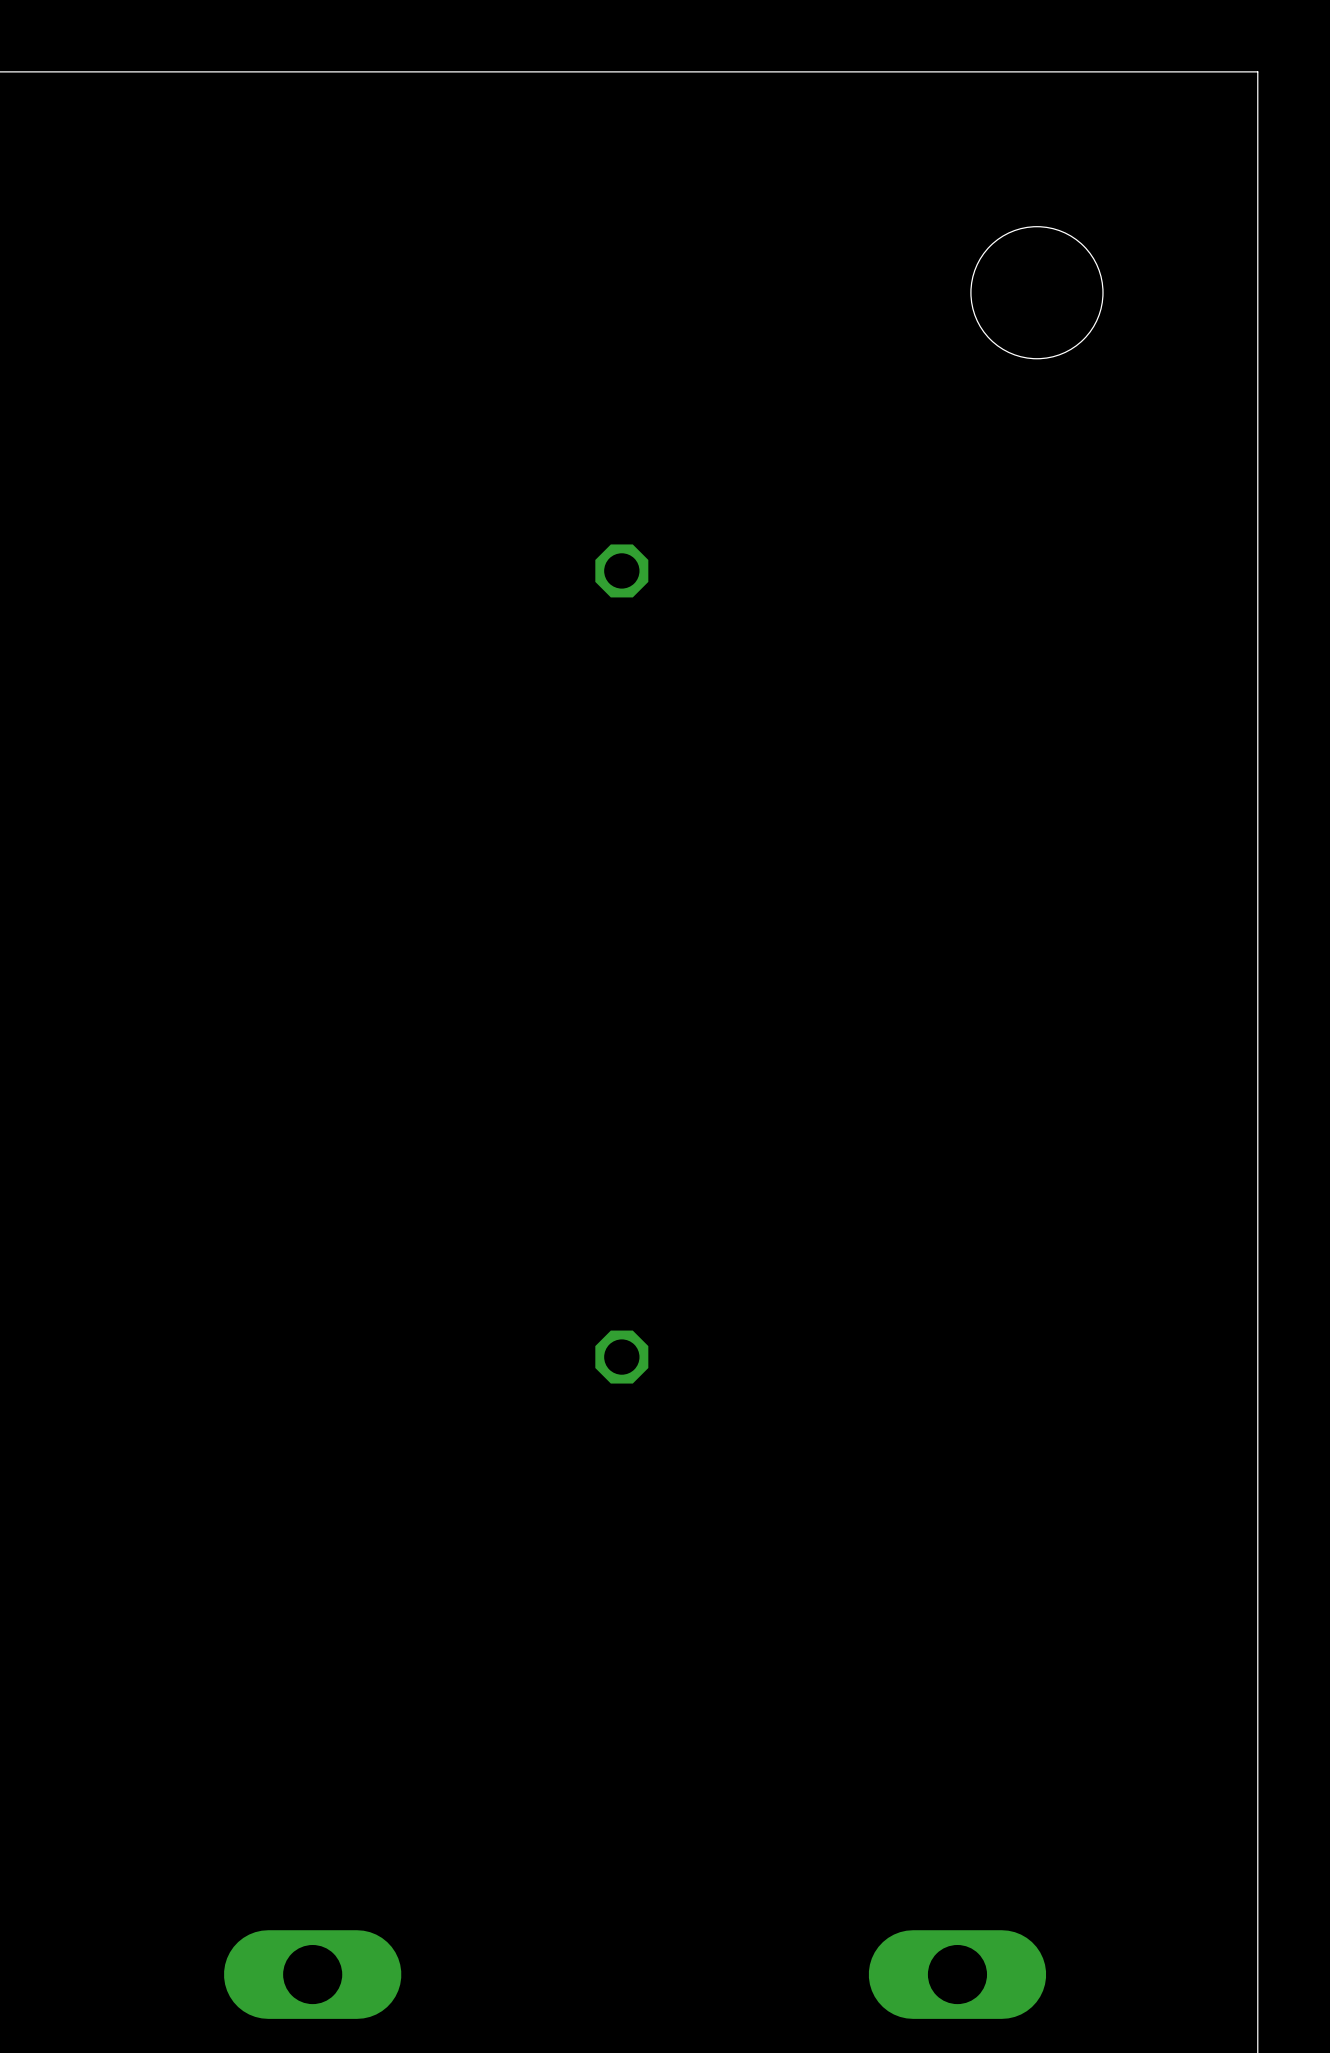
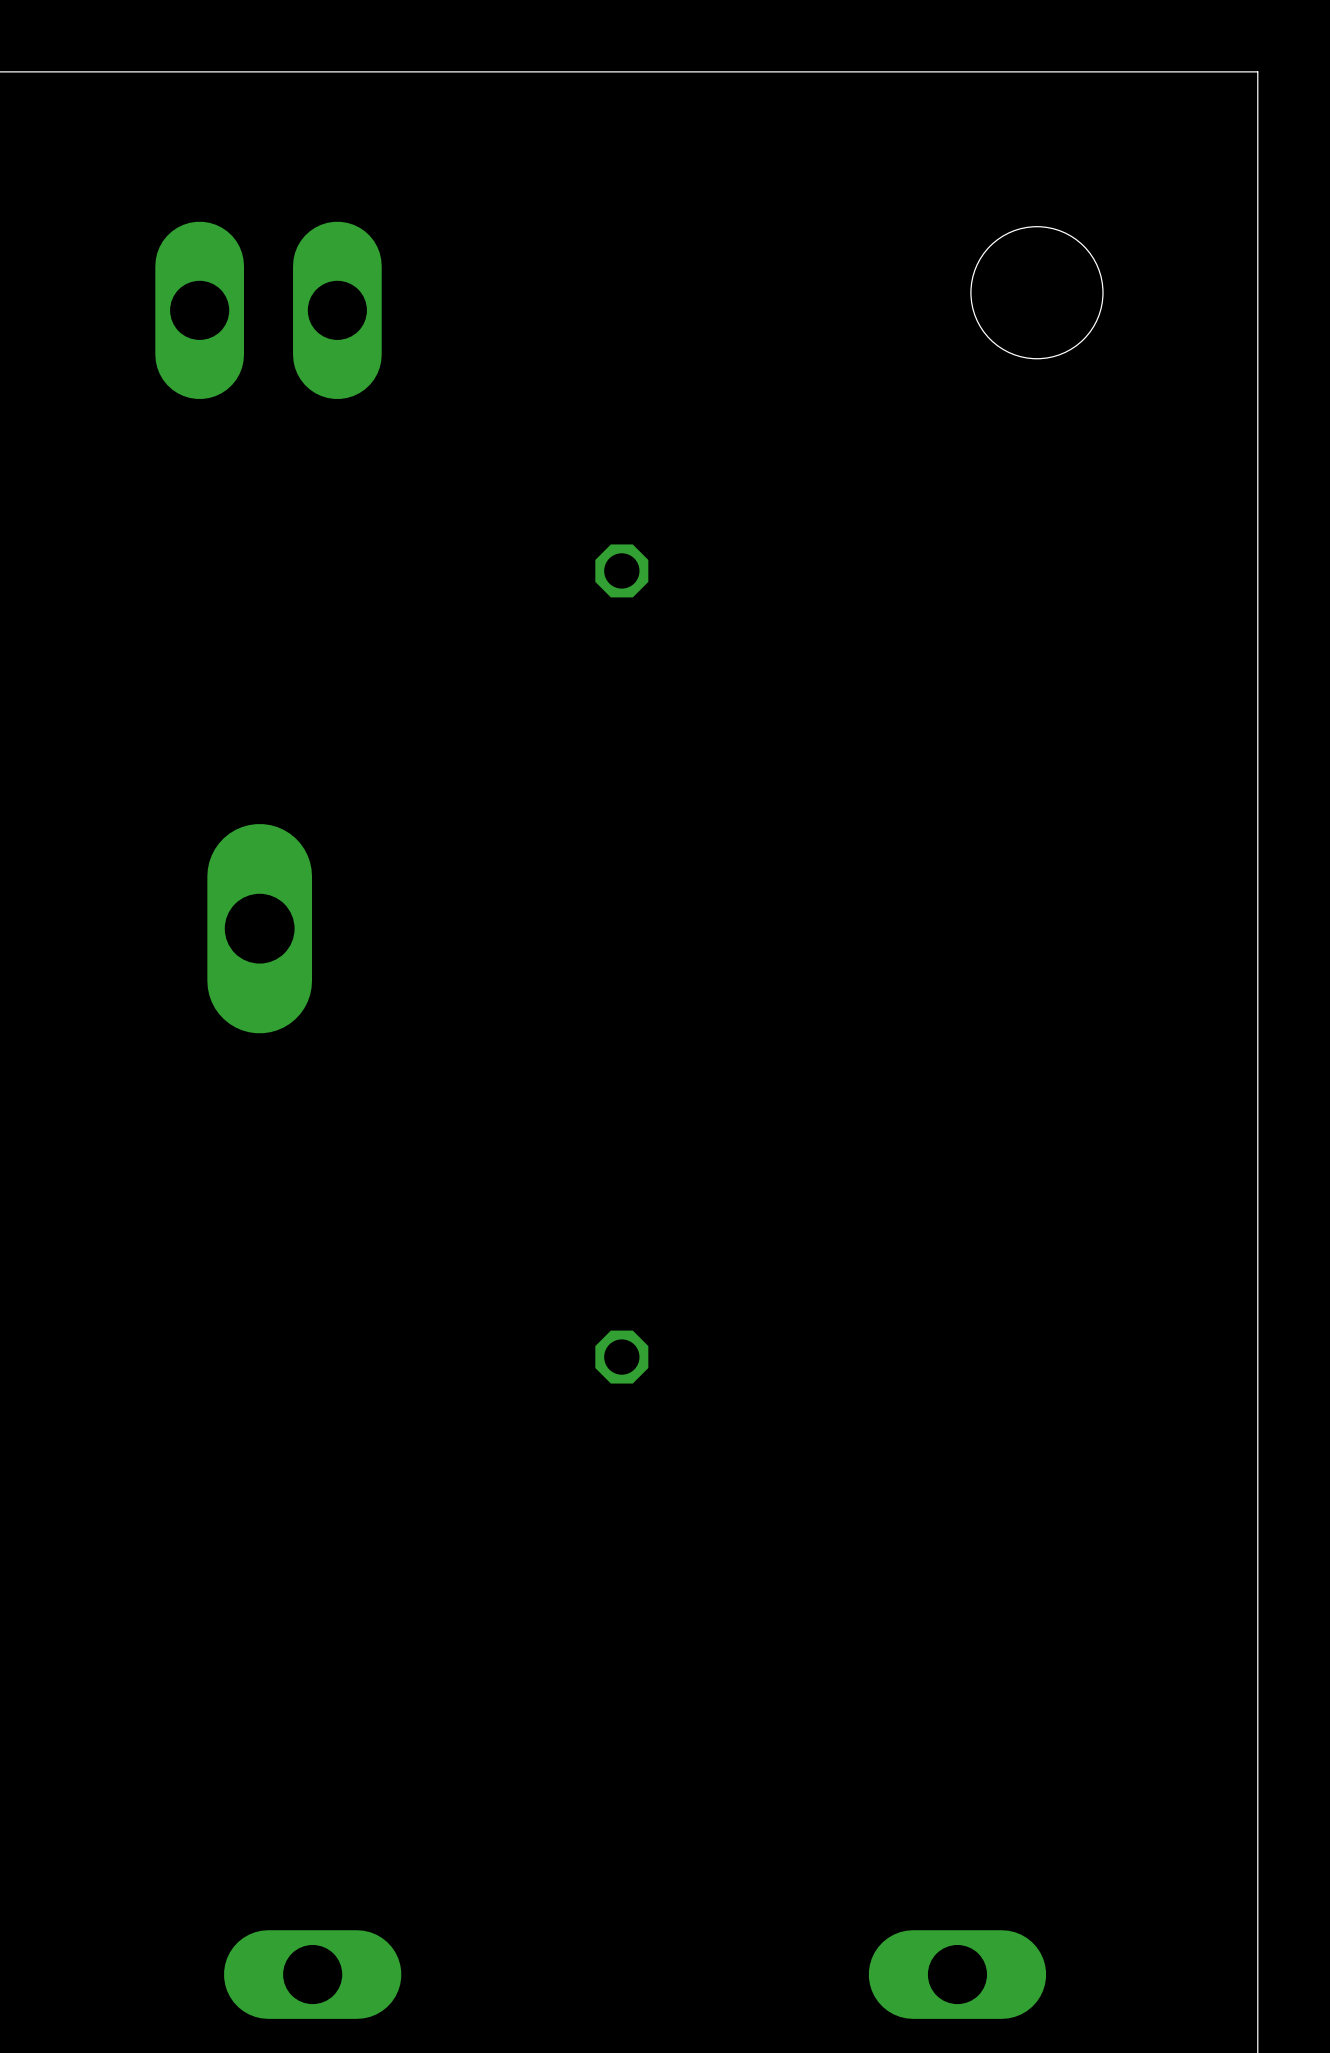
part: none -> (268, 310)
part: none -> (259, 928)

